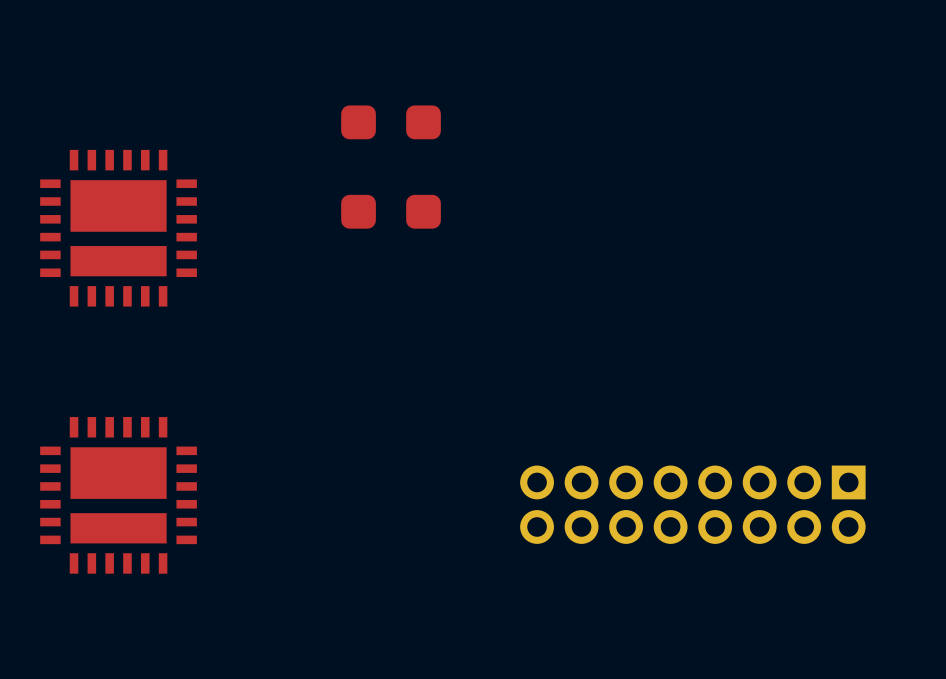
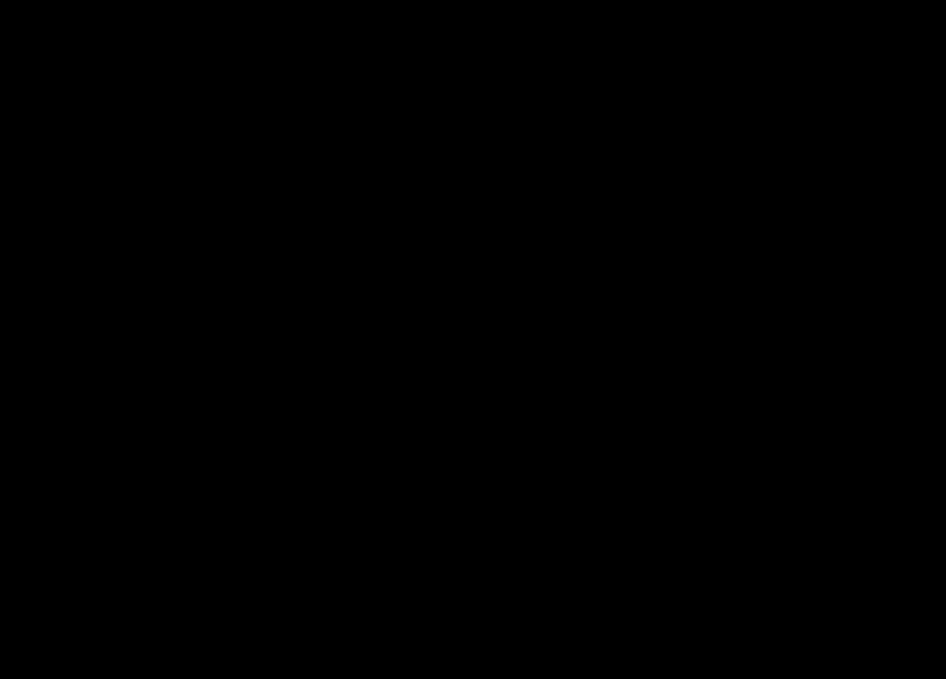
part: (391, 122) -> none
part: (391, 211) -> none
part: (118, 228) -> none
part: (118, 495) -> none
part: (692, 504) -> none

